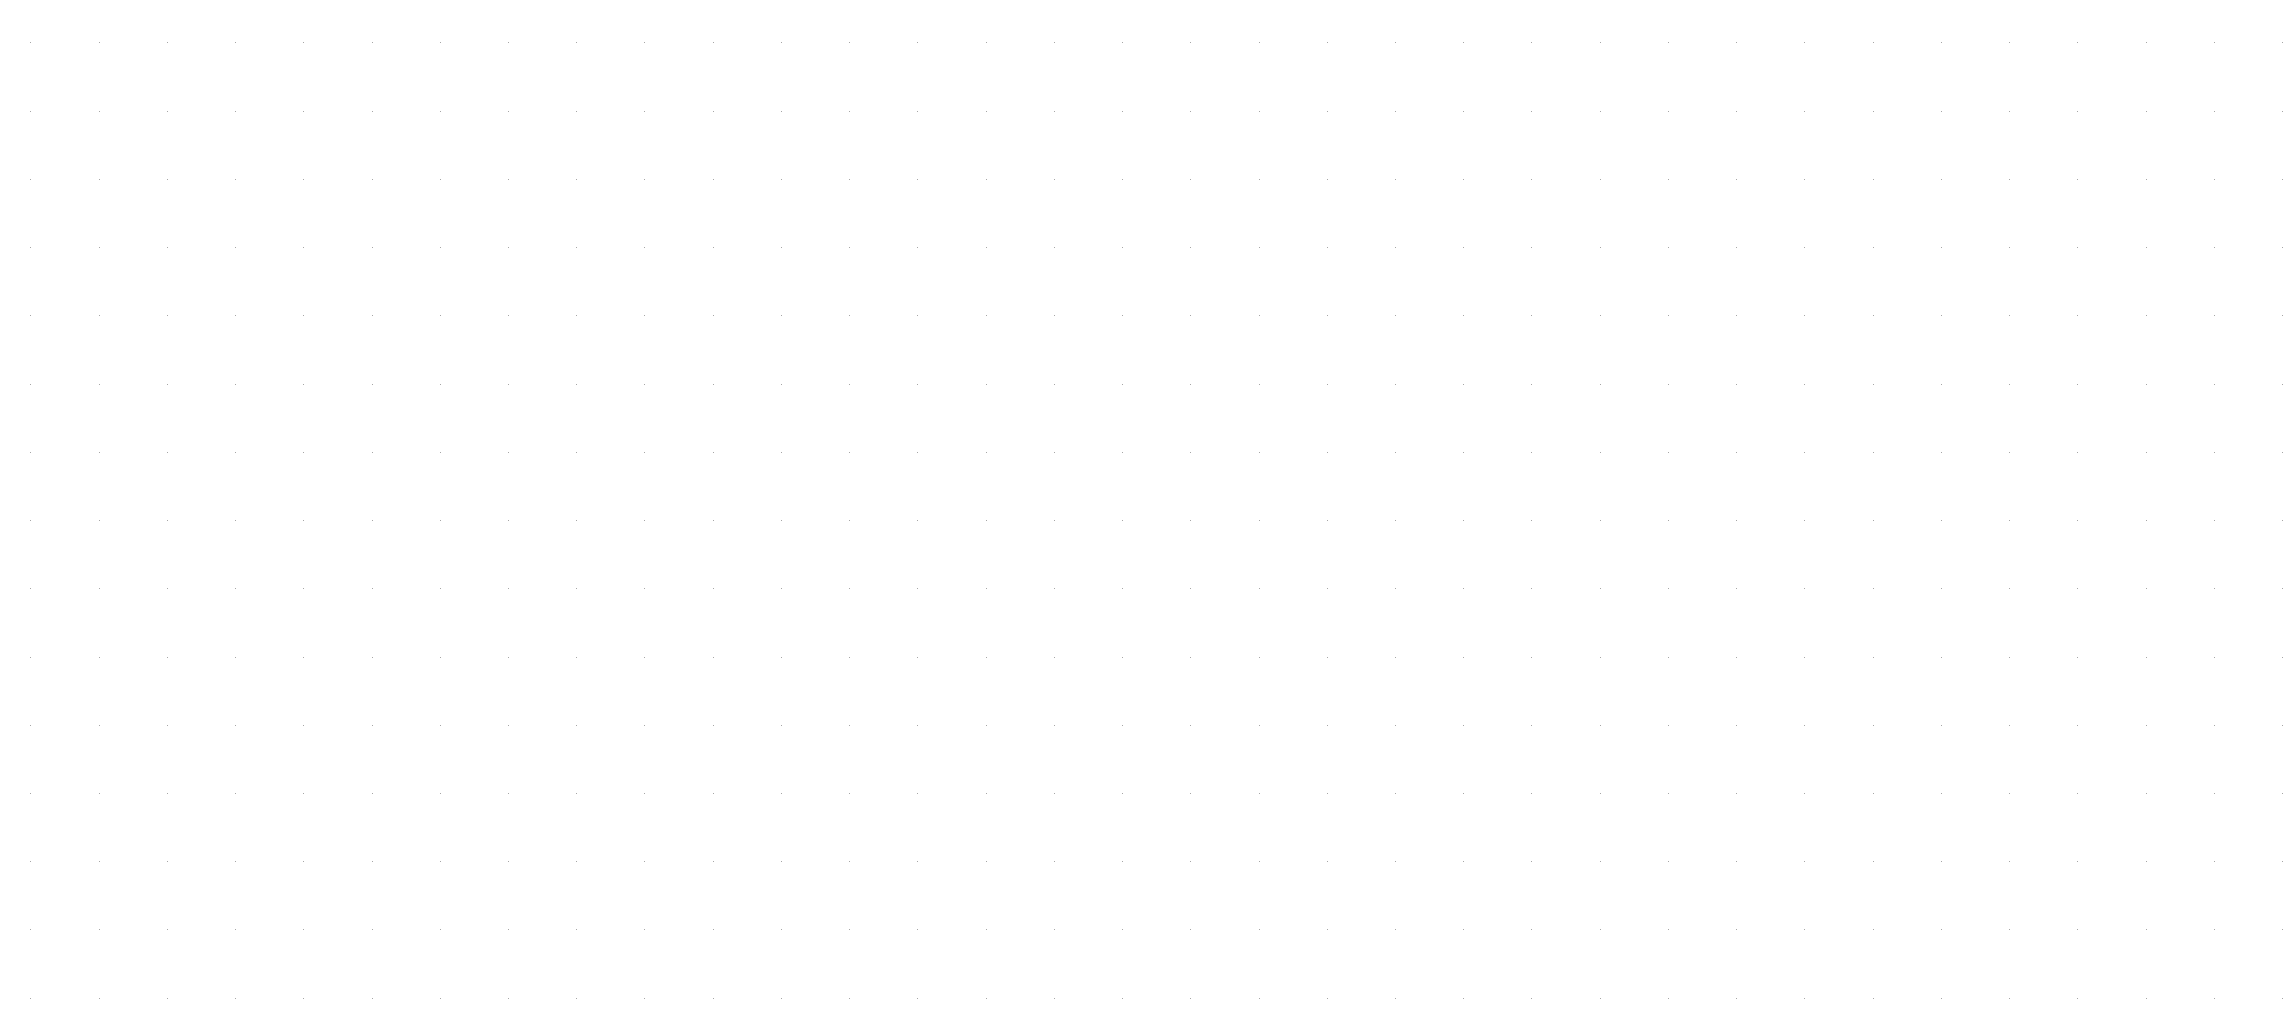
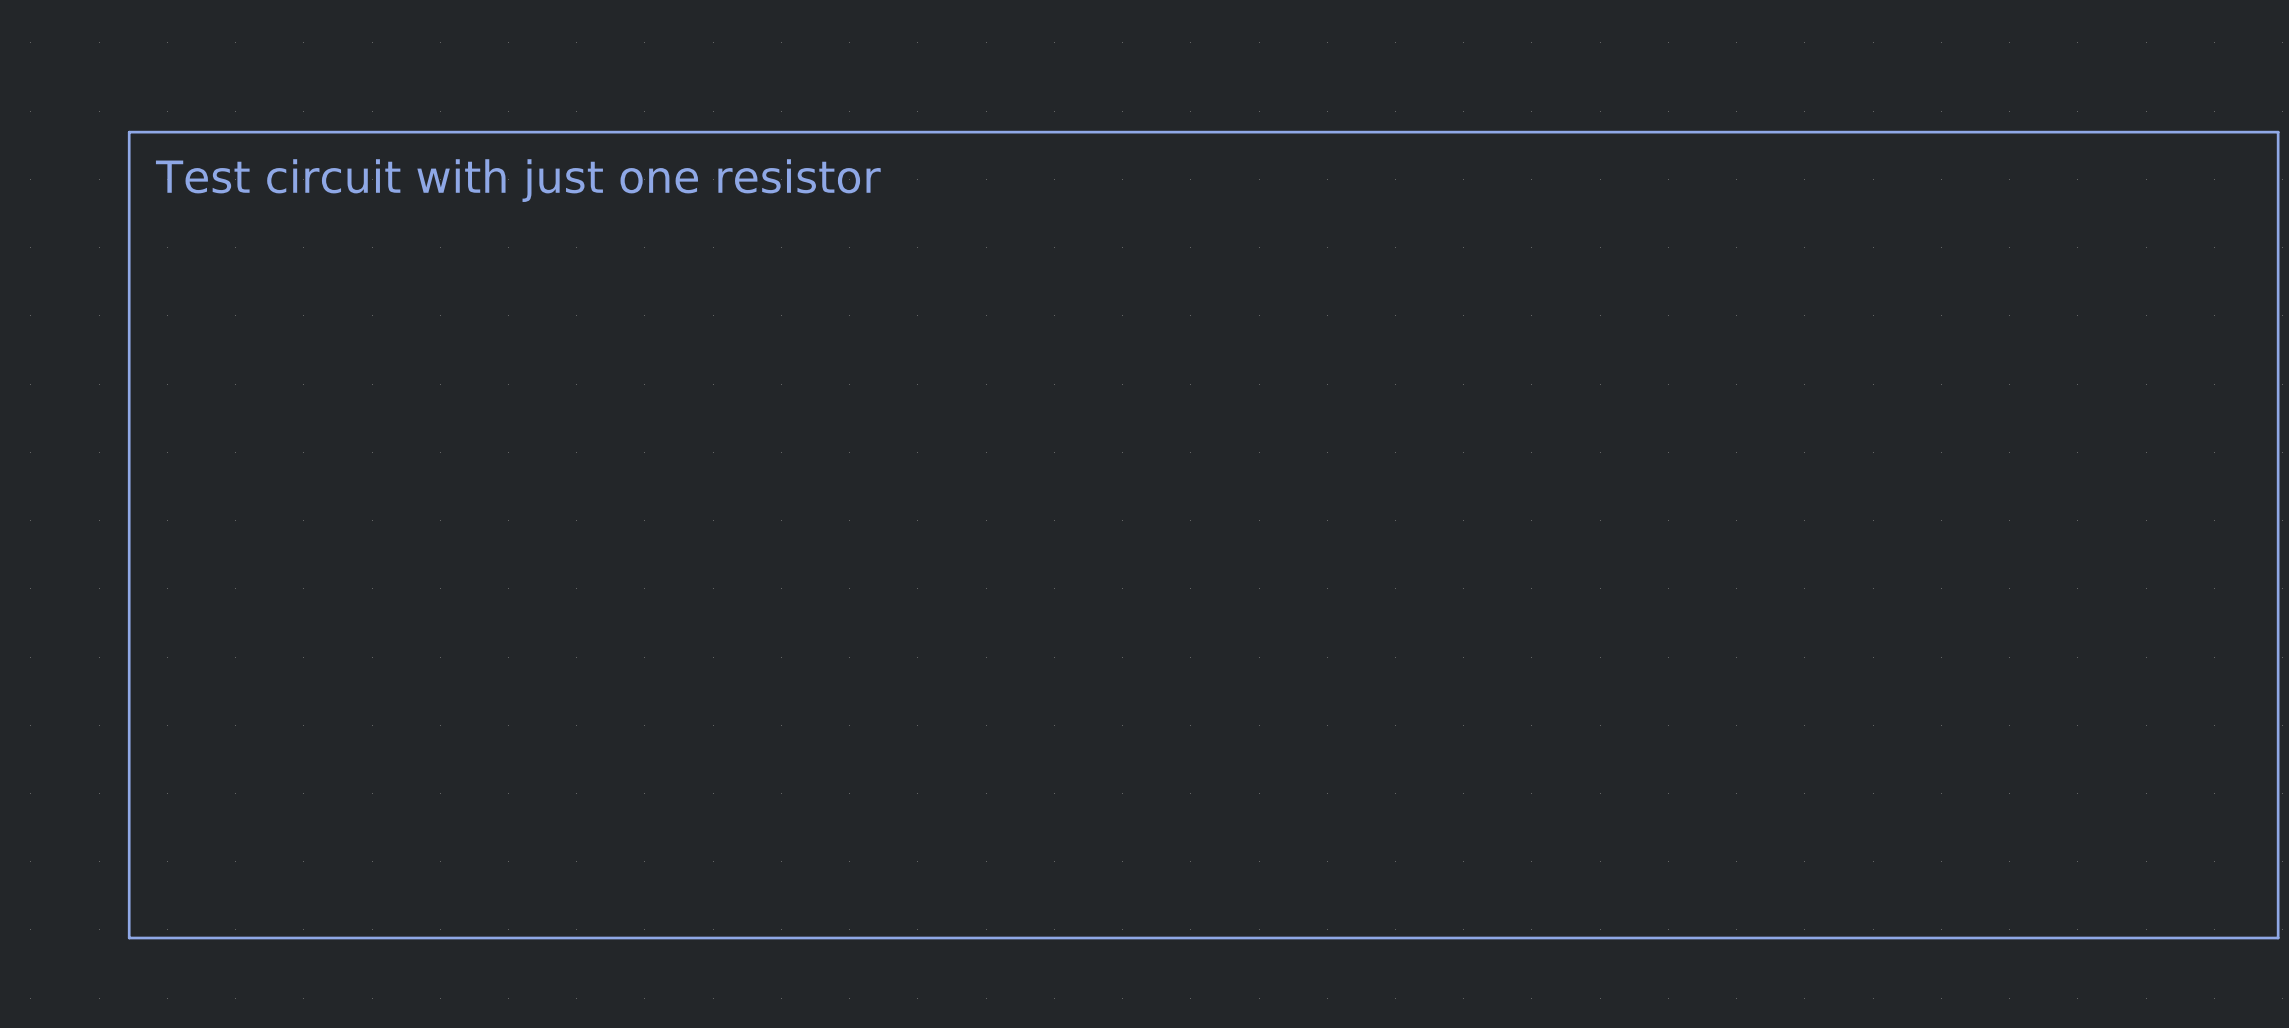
line: none -> (129, 132) (2278, 132) (2278, 938) (129, 938) (129, 132)
text: none -> Test circuit with just one resistor (518, 180)

